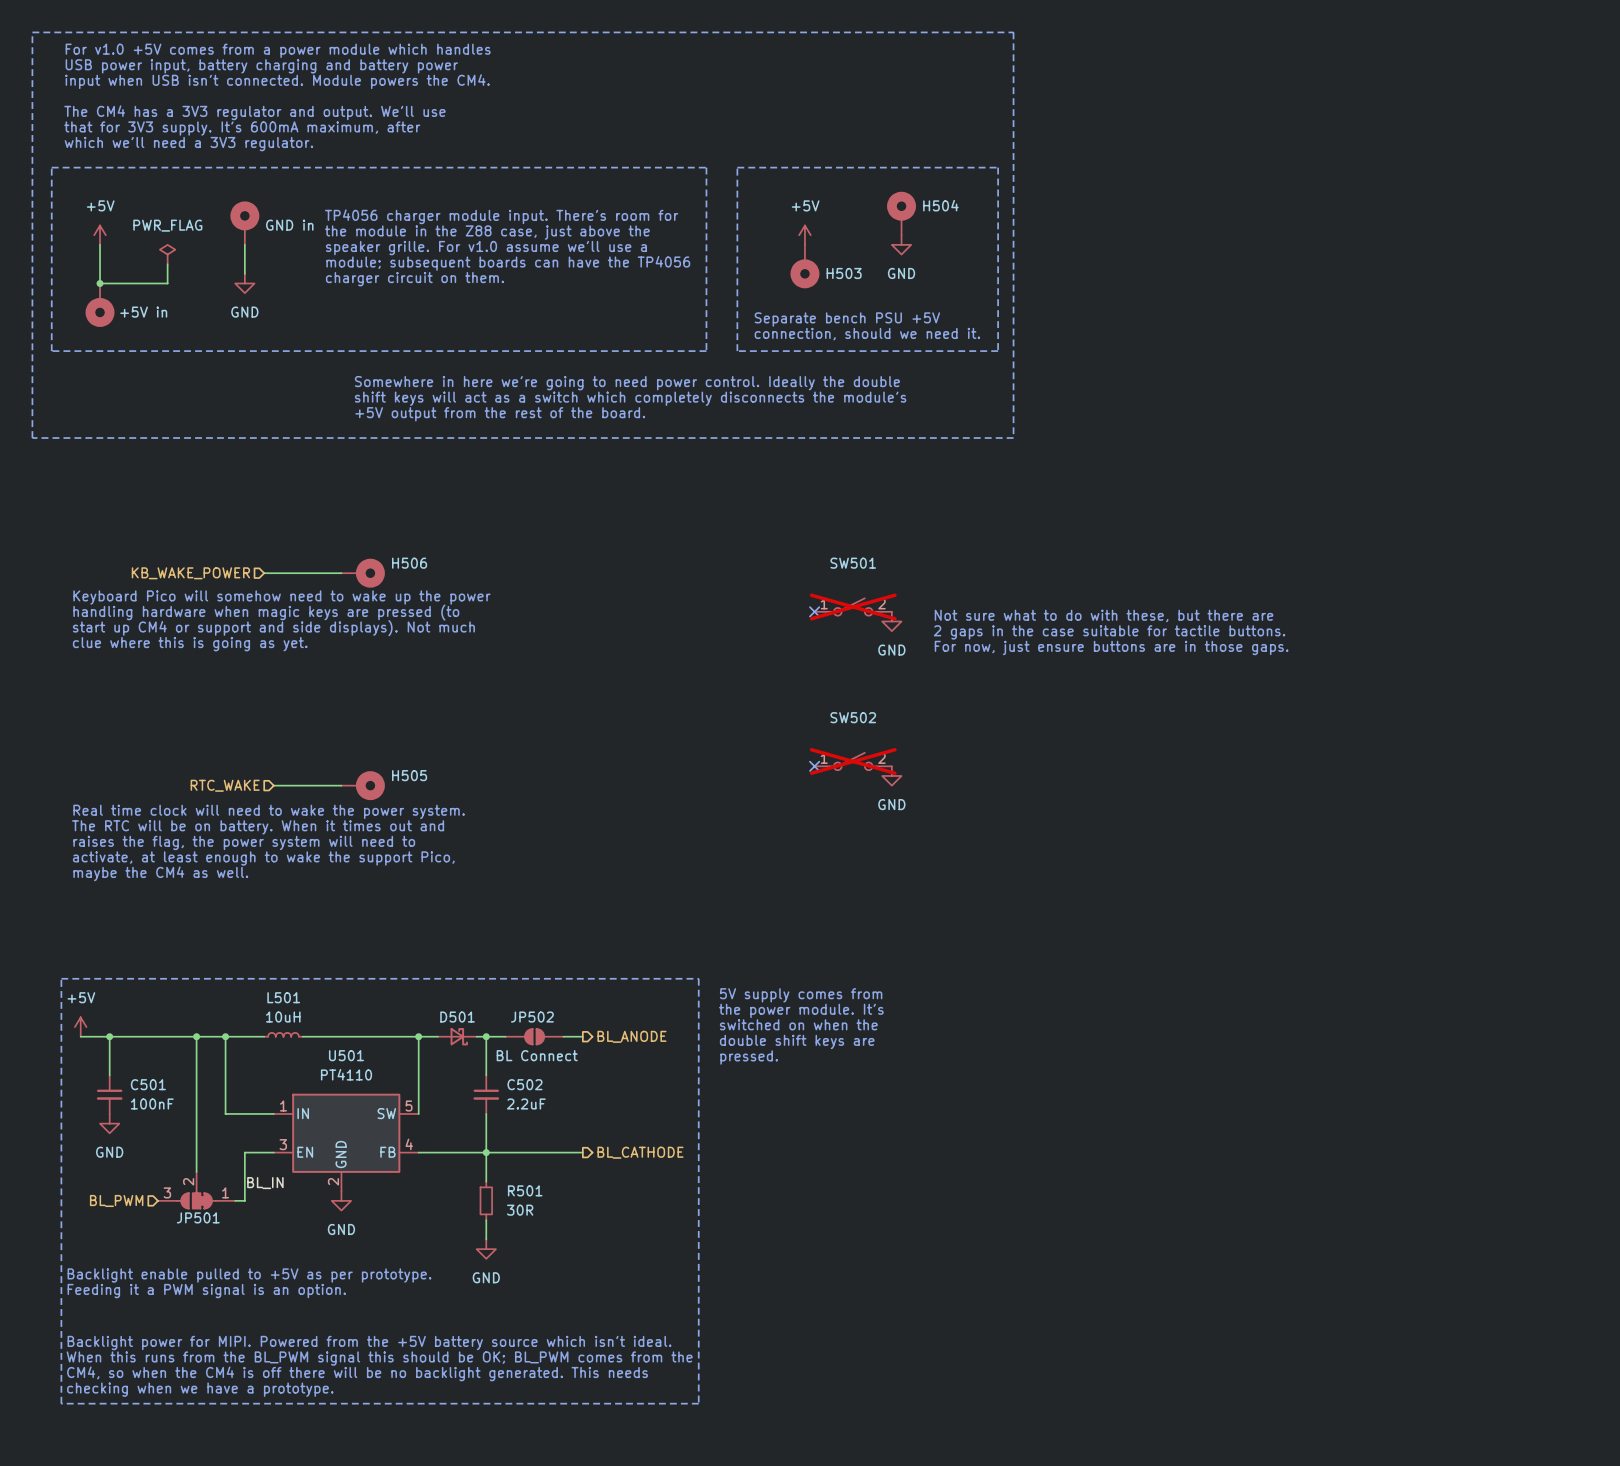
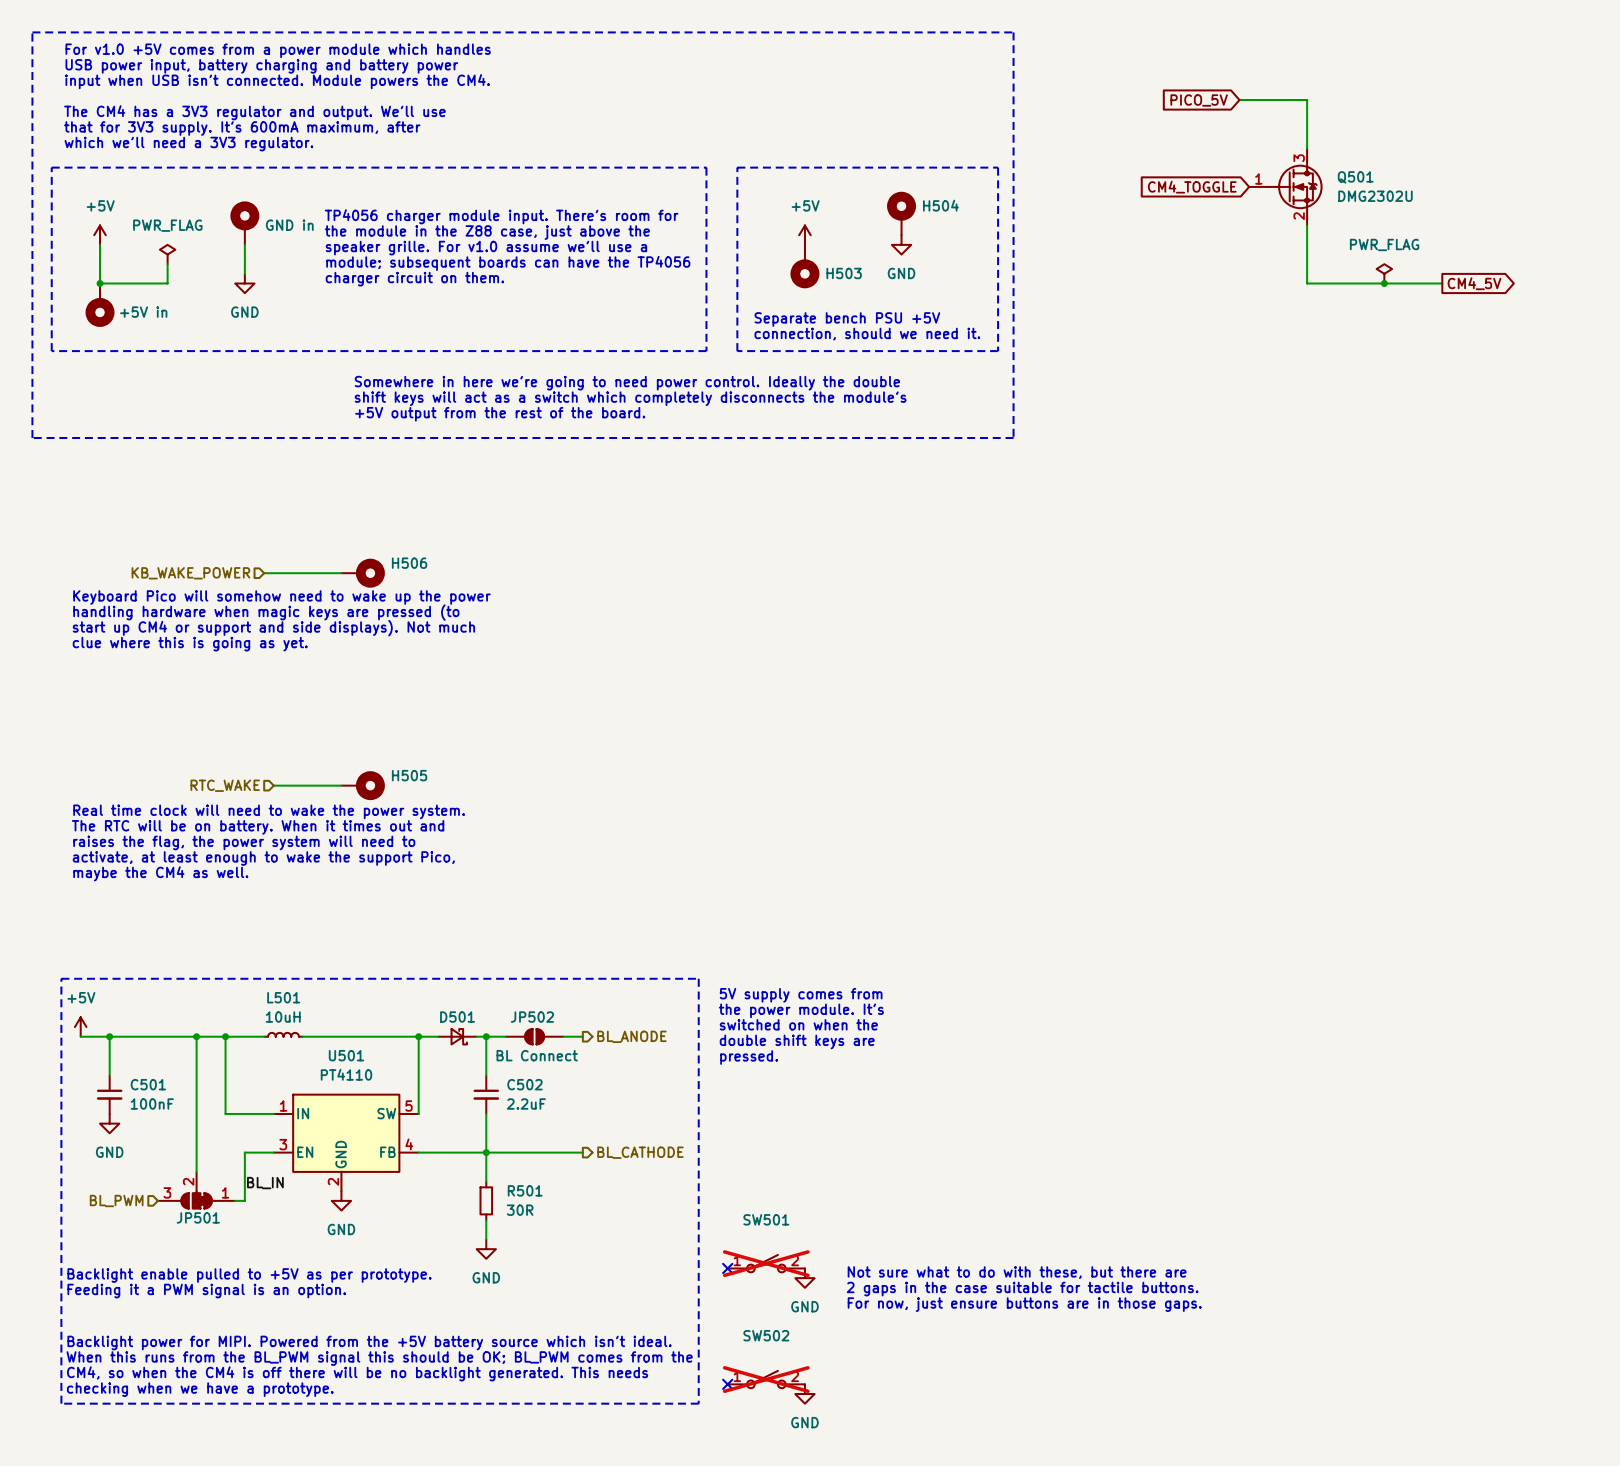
global label: none -> PICO_5V (1199, 100)
wire: none -> (1239, 100) (1307, 100) (1307, 148)
Q501: none -> DMG2302U (1285, 186)
global label: none -> CM4_TOGGLE (1192, 187)
wire: none -> (1307, 225) (1307, 283) (1442, 283)
power symbol: none -> PWR_FLAG (1384, 273)
junction: none -> (1384, 283)
global label: none -> CM4_5V (1474, 283)
SW501 position: (853, 606) -> (766, 1263)
no-connect mark: (814, 611) -> none
text: Not sure what to do with these, but there are (1104, 615) -> none
power symbol: GND (891, 621) -> none
text: 2 gaps in the case suitable for tactile buttons. (1109, 632) -> none
text: For now, just ensure buttons are in those gaps. (1111, 647) -> none
SW502 position: (853, 761) -> (766, 1379)
no-connect mark: (814, 766) -> none
power symbol: GND (891, 775) -> none
no-connect mark: none -> (727, 1268)
text: none -> Not sure what to do with these, but there are (1017, 1272)
power symbol: none -> GND (804, 1278)
text: none -> 2 gaps in the case suitable for tactile buttons. (1022, 1289)
text: none -> For now, just ensure buttons are in those gaps. (1024, 1304)
no-connect mark: none -> (727, 1384)
power symbol: none -> GND (804, 1394)

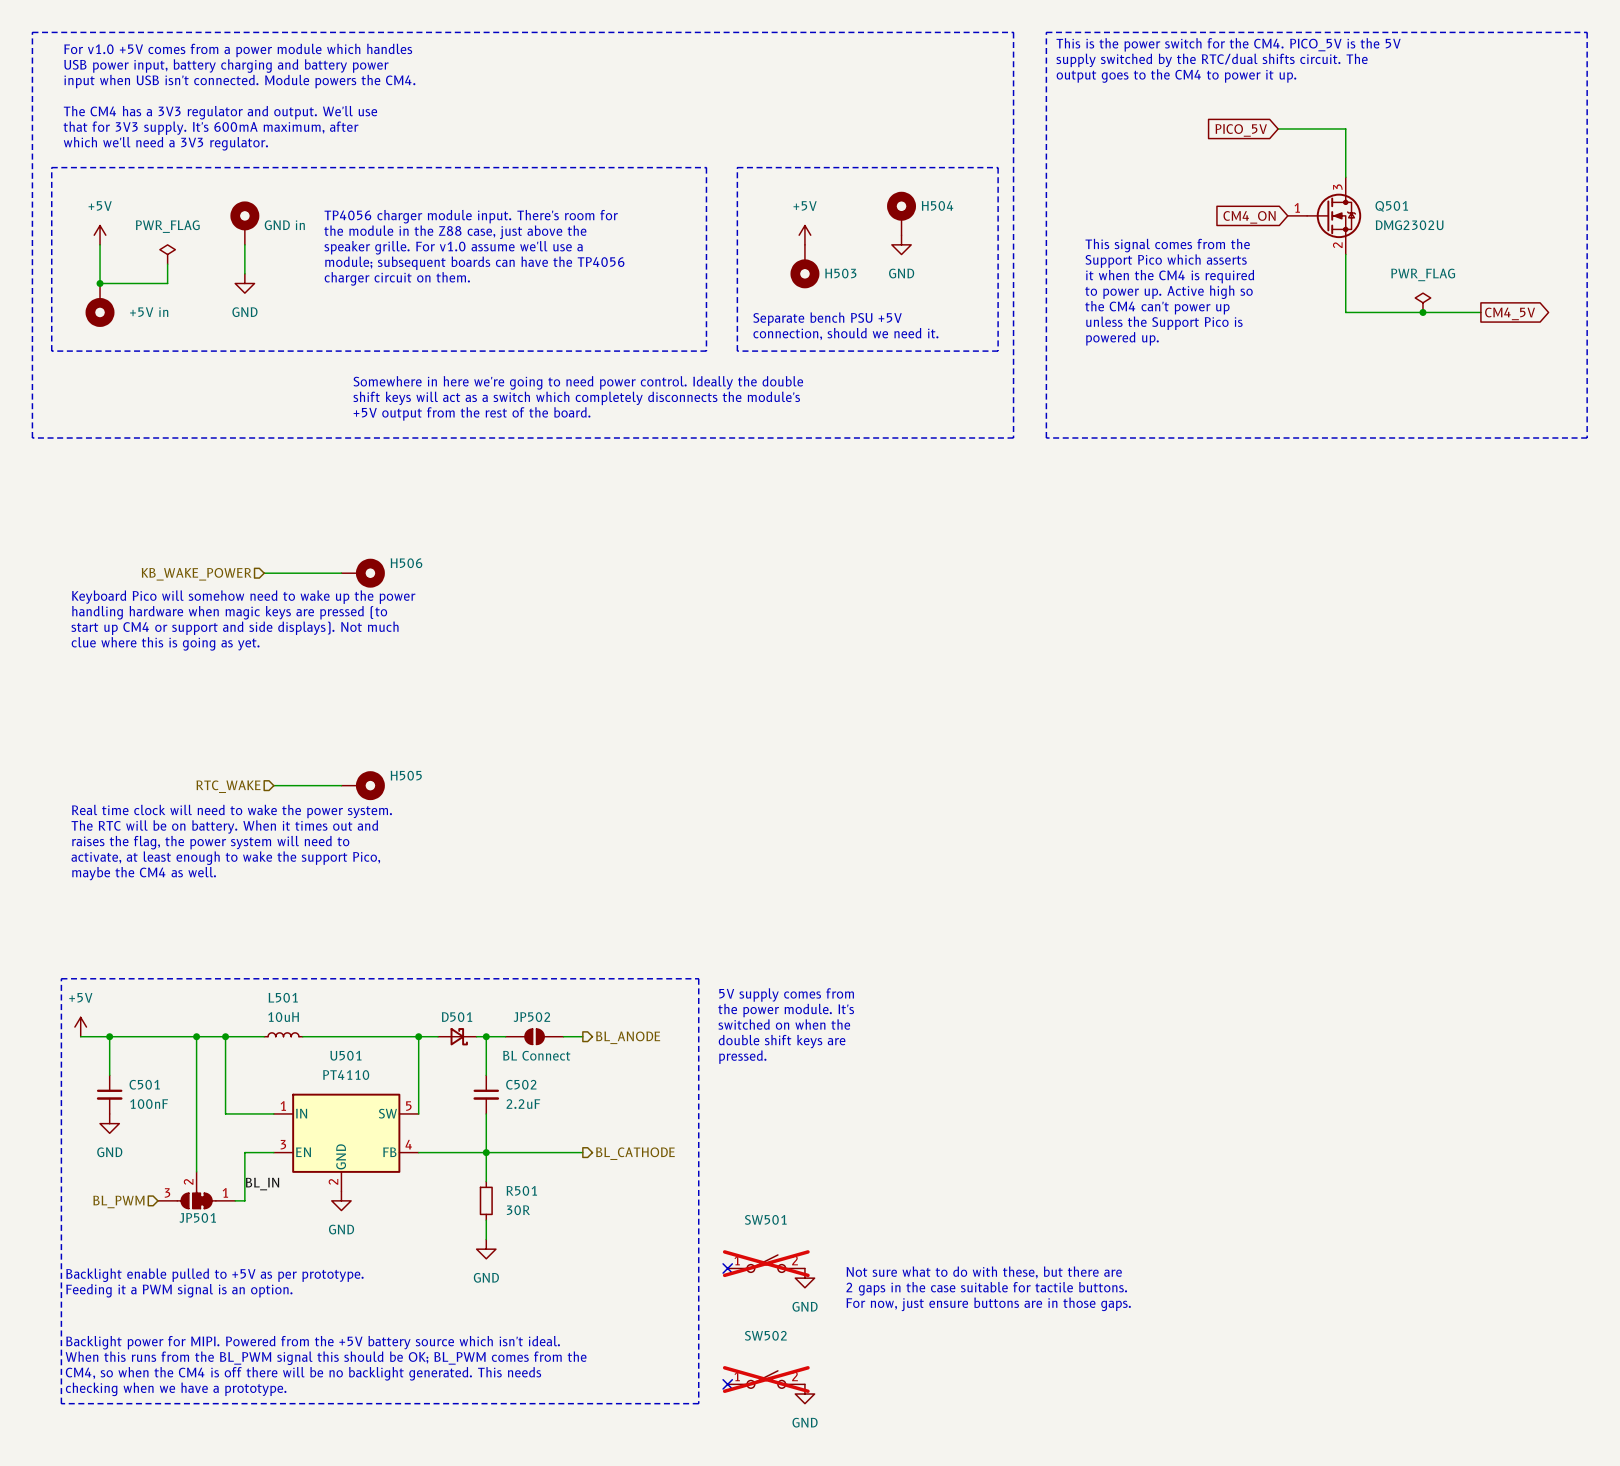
line: none -> (1046, 32) (1587, 32) (1587, 438) (1046, 438) (1046, 32)
text: none -> This is the power switch for the CM4. PICO_5V is the 5V (1228, 44)
text: none -> supply switched by the RTC/dual shifts circuit. The (1212, 60)
text: none -> output goes to the CM4 to power it up. (1176, 76)
global label position: PICO_5V (1199, 100) -> PICO_5V (1241, 130)
wire: (1239, 100) (1307, 100) (1307, 148) -> (1278, 128) (1345, 128) (1345, 177)
Q501 position: (1285, 186) -> (1324, 215)
global label: CM4_TOGGLE (1192, 187) -> none
global label: none -> CM4_ON (1249, 217)
wire: (1307, 225) (1307, 283) (1442, 283) -> (1345, 254) (1345, 312) (1480, 312)
text: none -> This signal comes from the (1167, 245)
text: none -> Support Pico which asserts (1166, 261)
power symbol position: PWR_FLAG (1384, 273) -> PWR_FLAG (1422, 302)
text: none -> it when the CM4 is required (1170, 276)
junction: (1384, 283) -> none
global label position: CM4_5V (1474, 283) -> CM4_5V (1510, 313)
text: none -> to power up. Active high so (1169, 292)
text: none -> the CM4 can't power up (1157, 307)
junction: none -> (1422, 312)
text: none -> unless the Support Pico is (1164, 323)
text: none -> powered up. (1122, 338)

